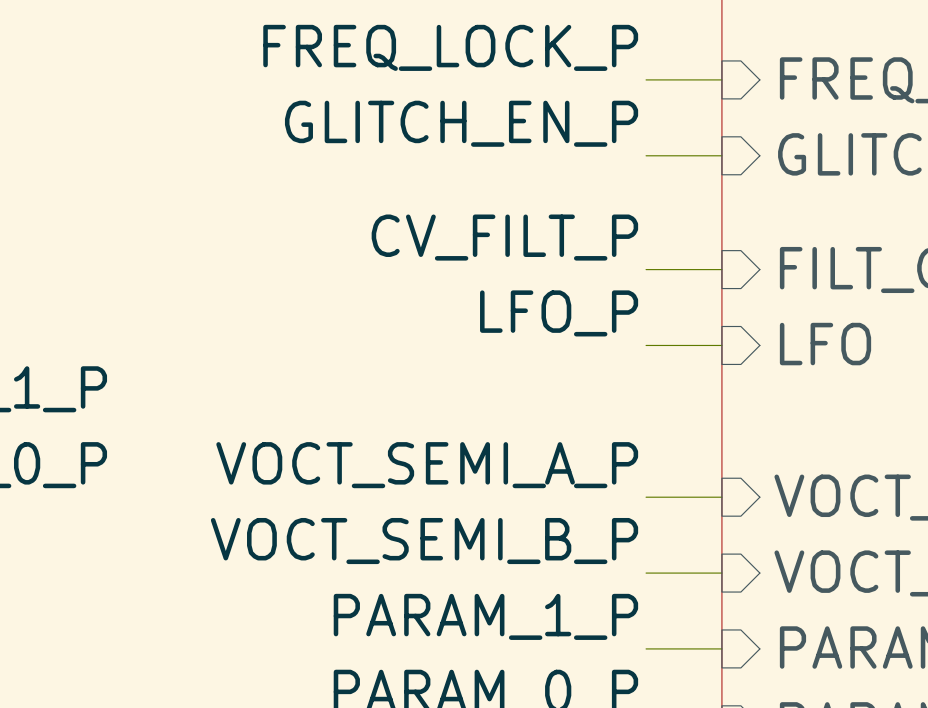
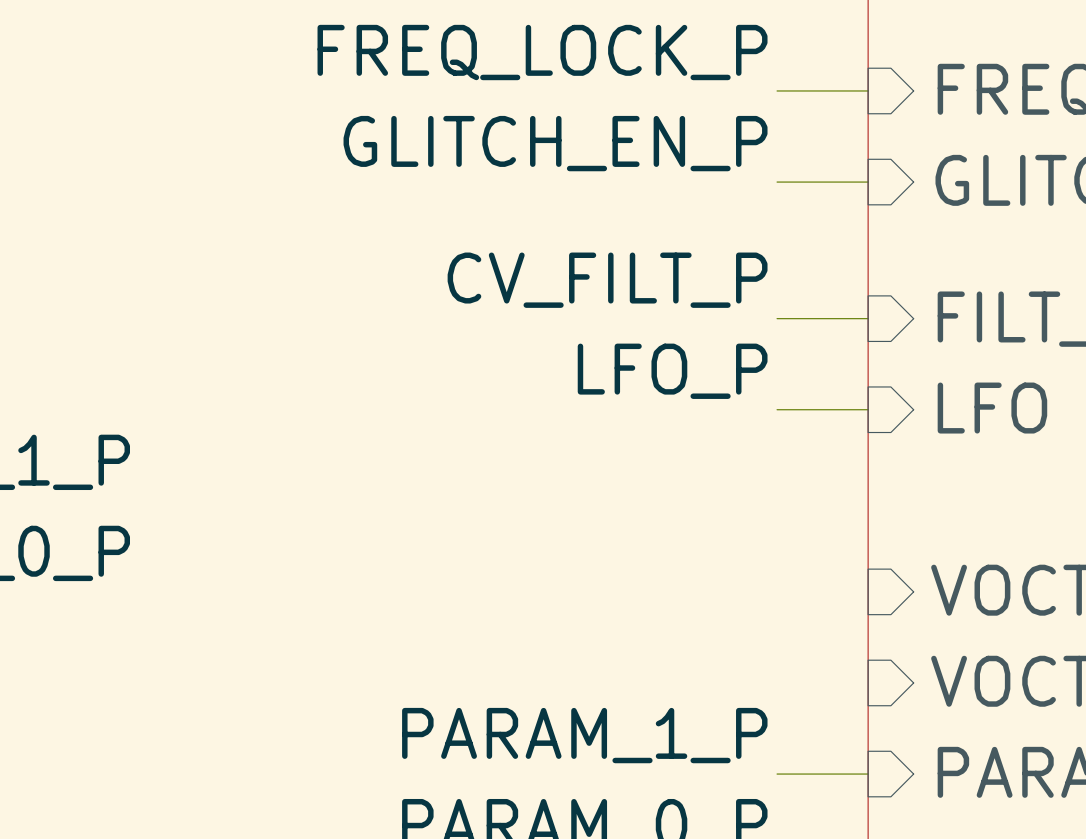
label: VOCT_SEMI_A_P (427, 465) -> none
wire: (646, 497) (721, 497) -> none
label: VOCT_SEMI_B_P (424, 541) -> none
wire: (646, 573) (721, 573) -> none

